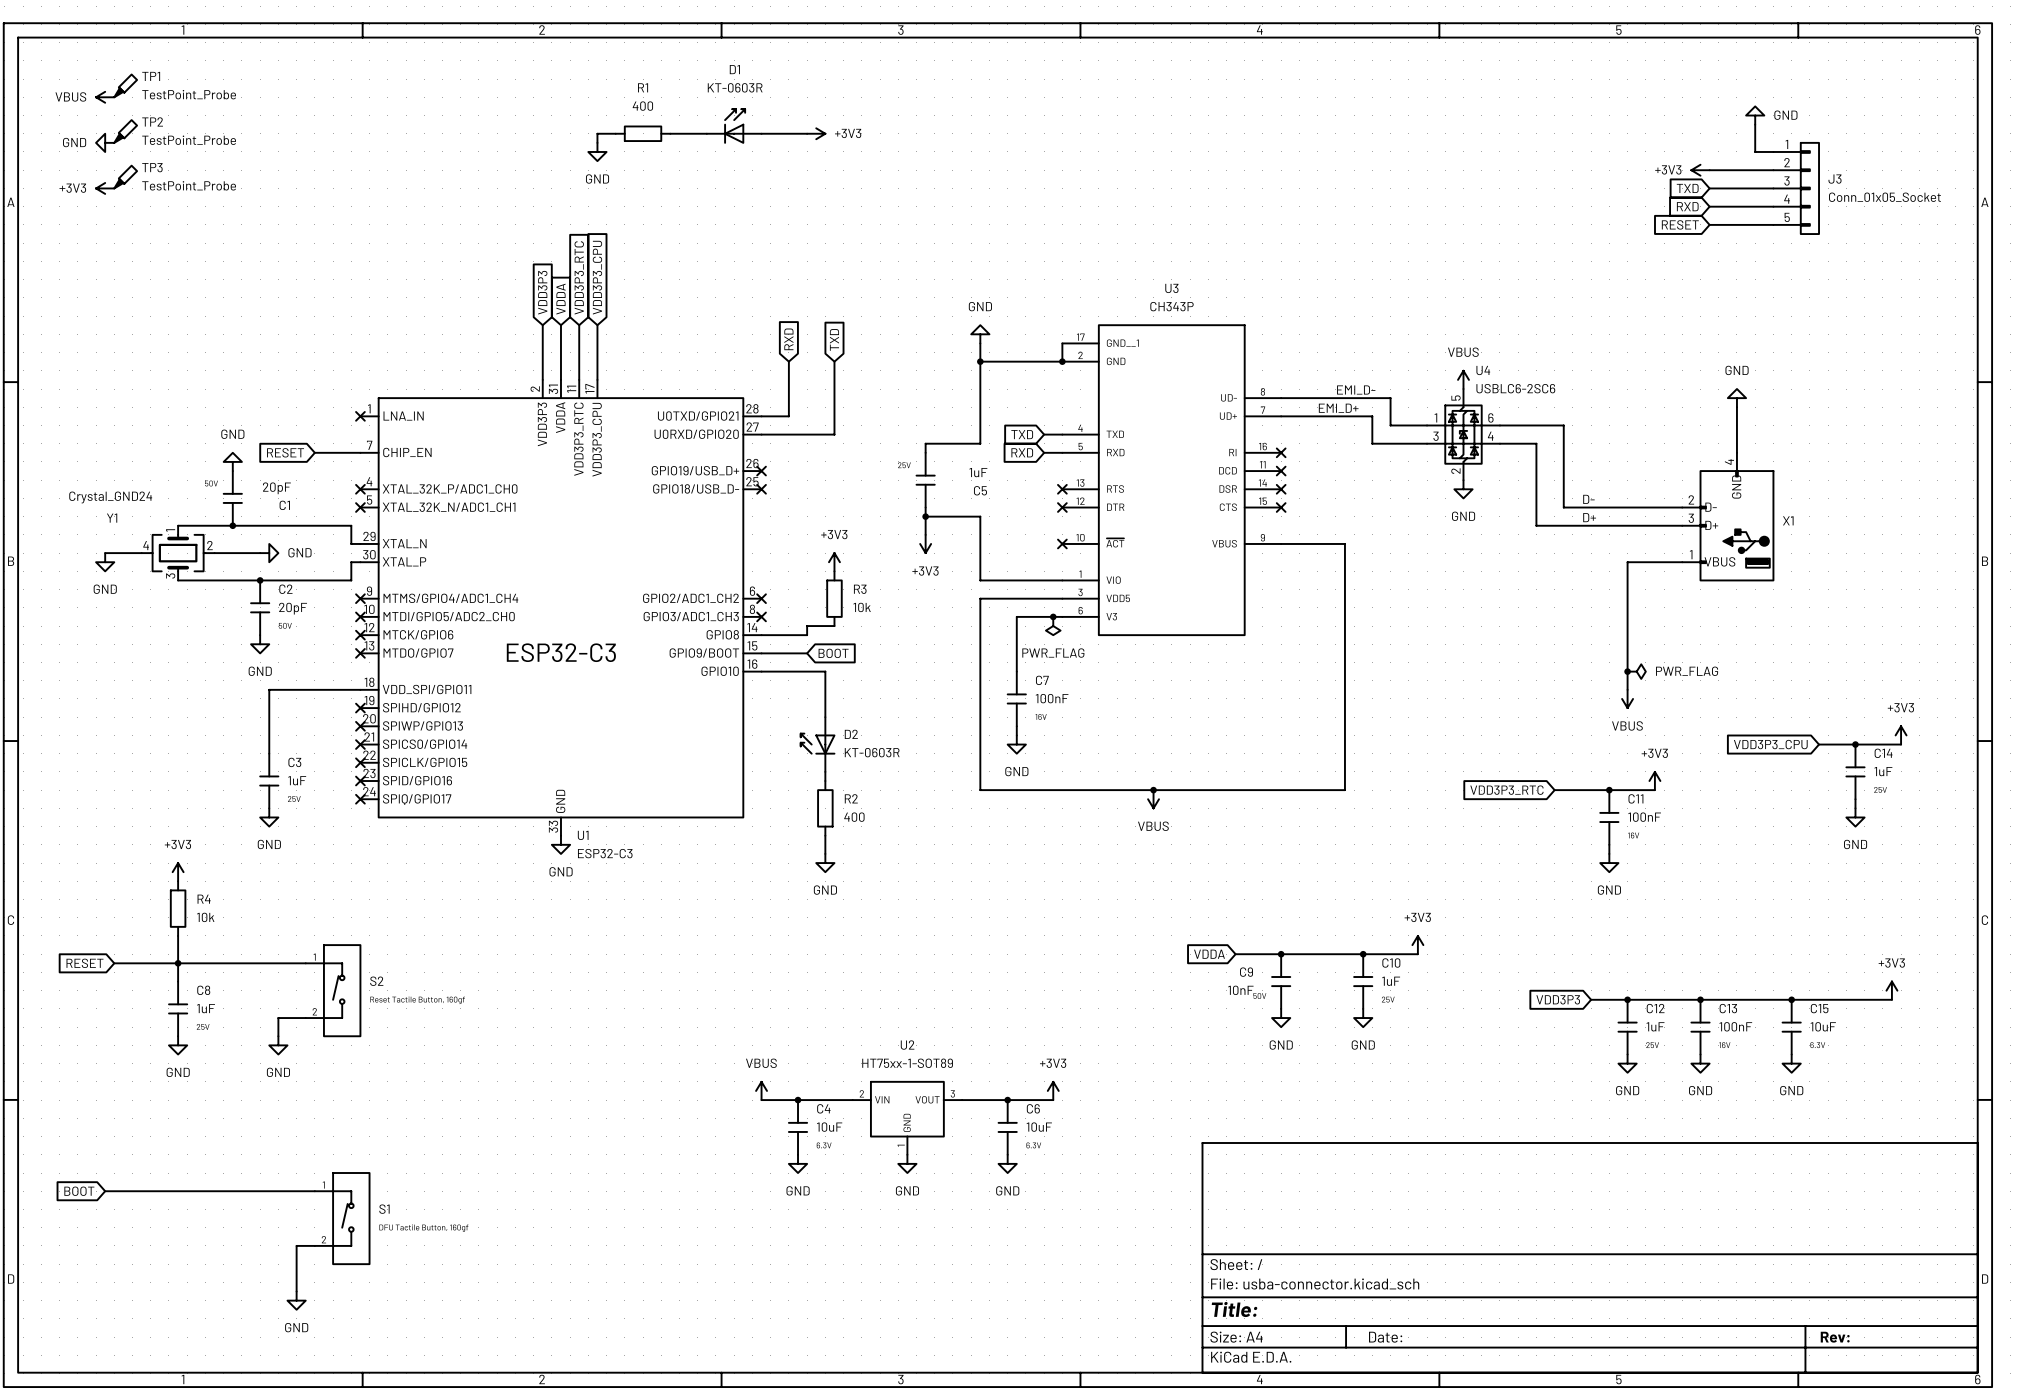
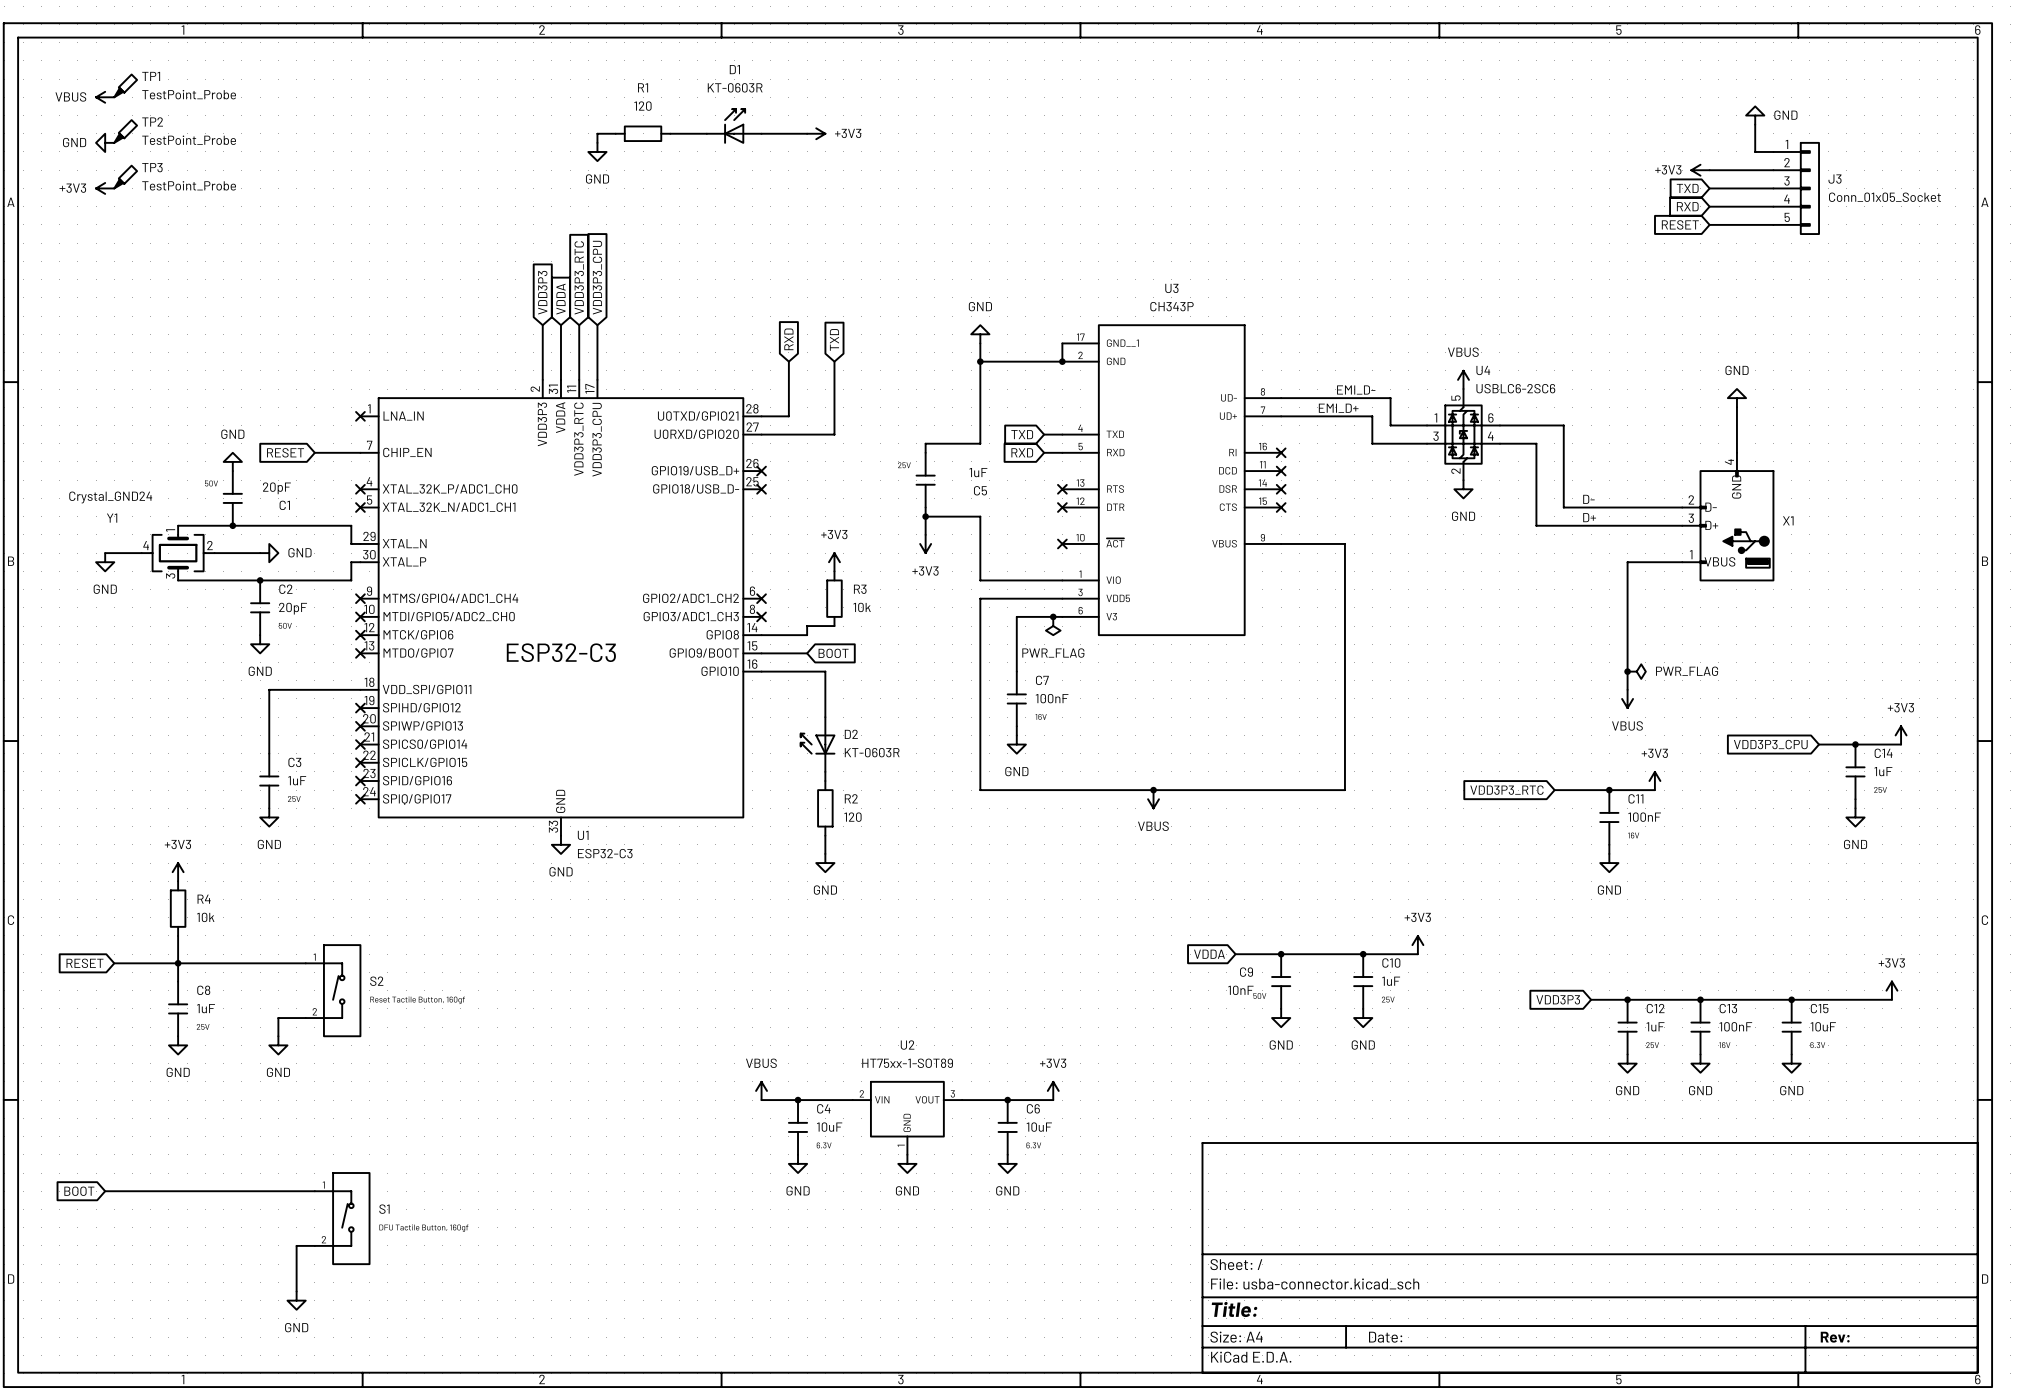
R1 value: 400 (642, 106) -> 120 (642, 106)
R2 value: 400 (854, 817) -> 120 (852, 817)

